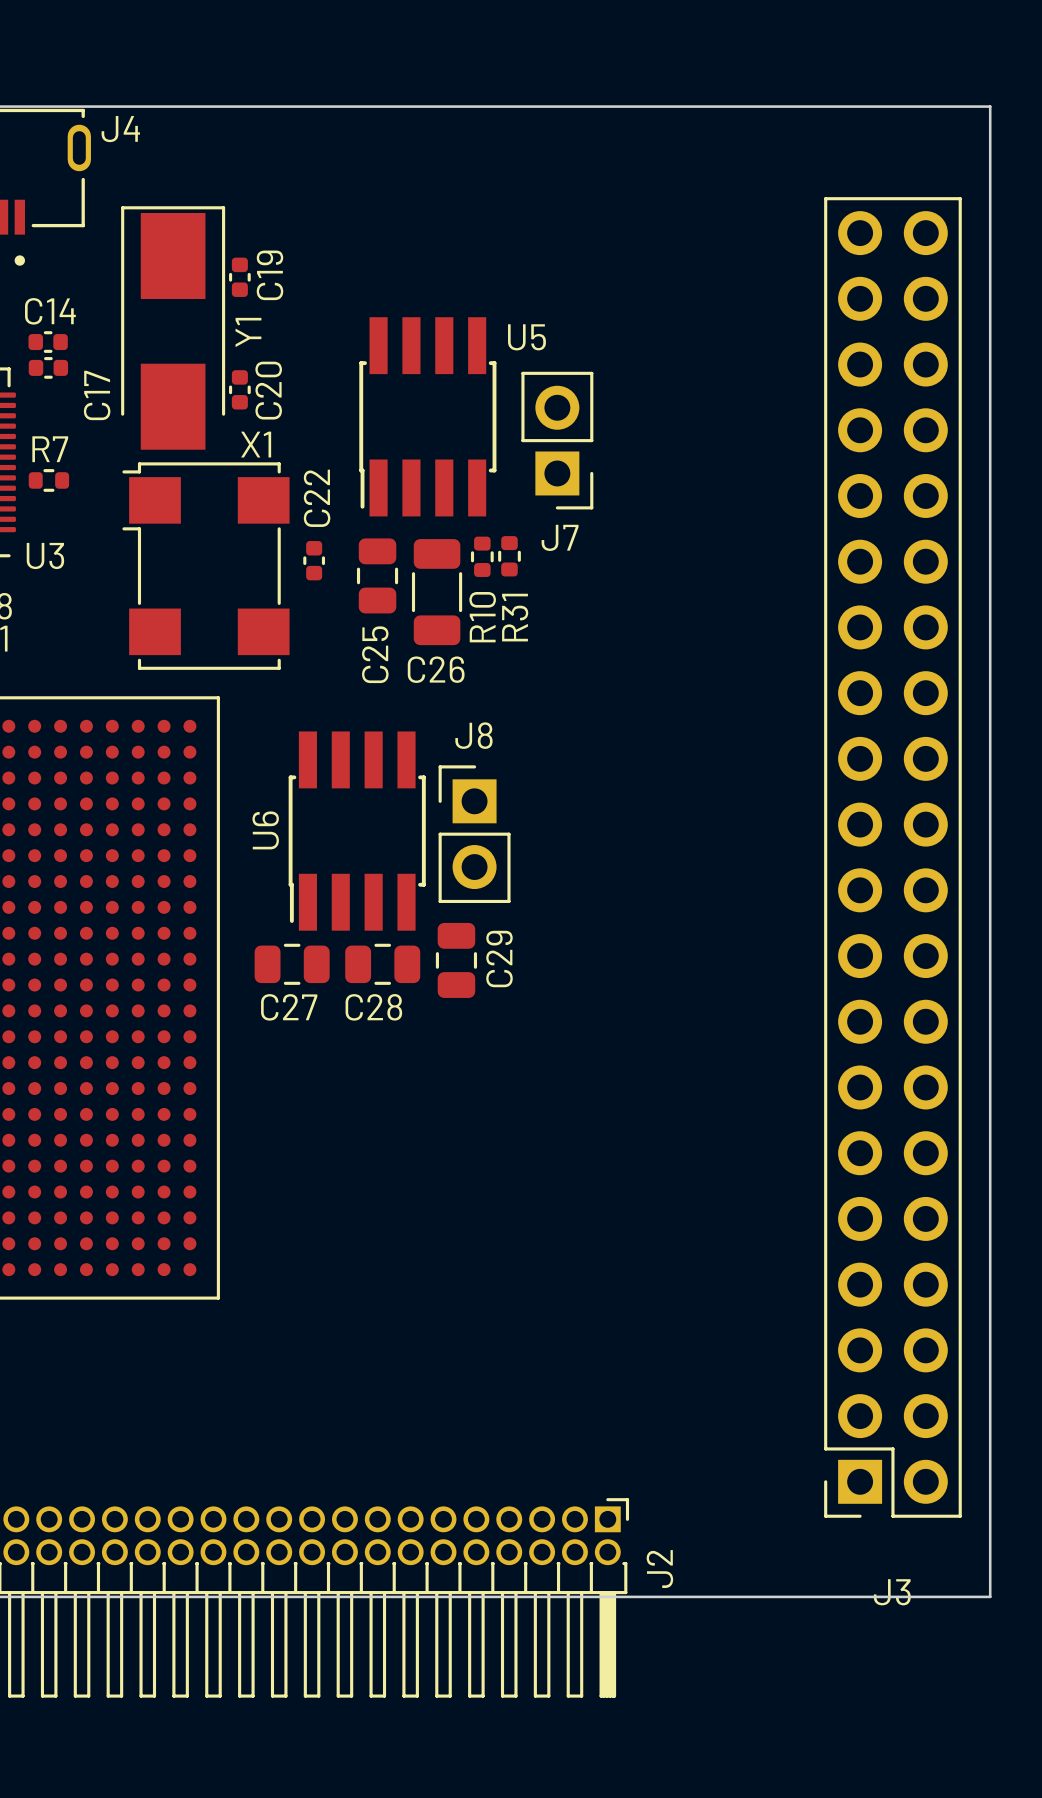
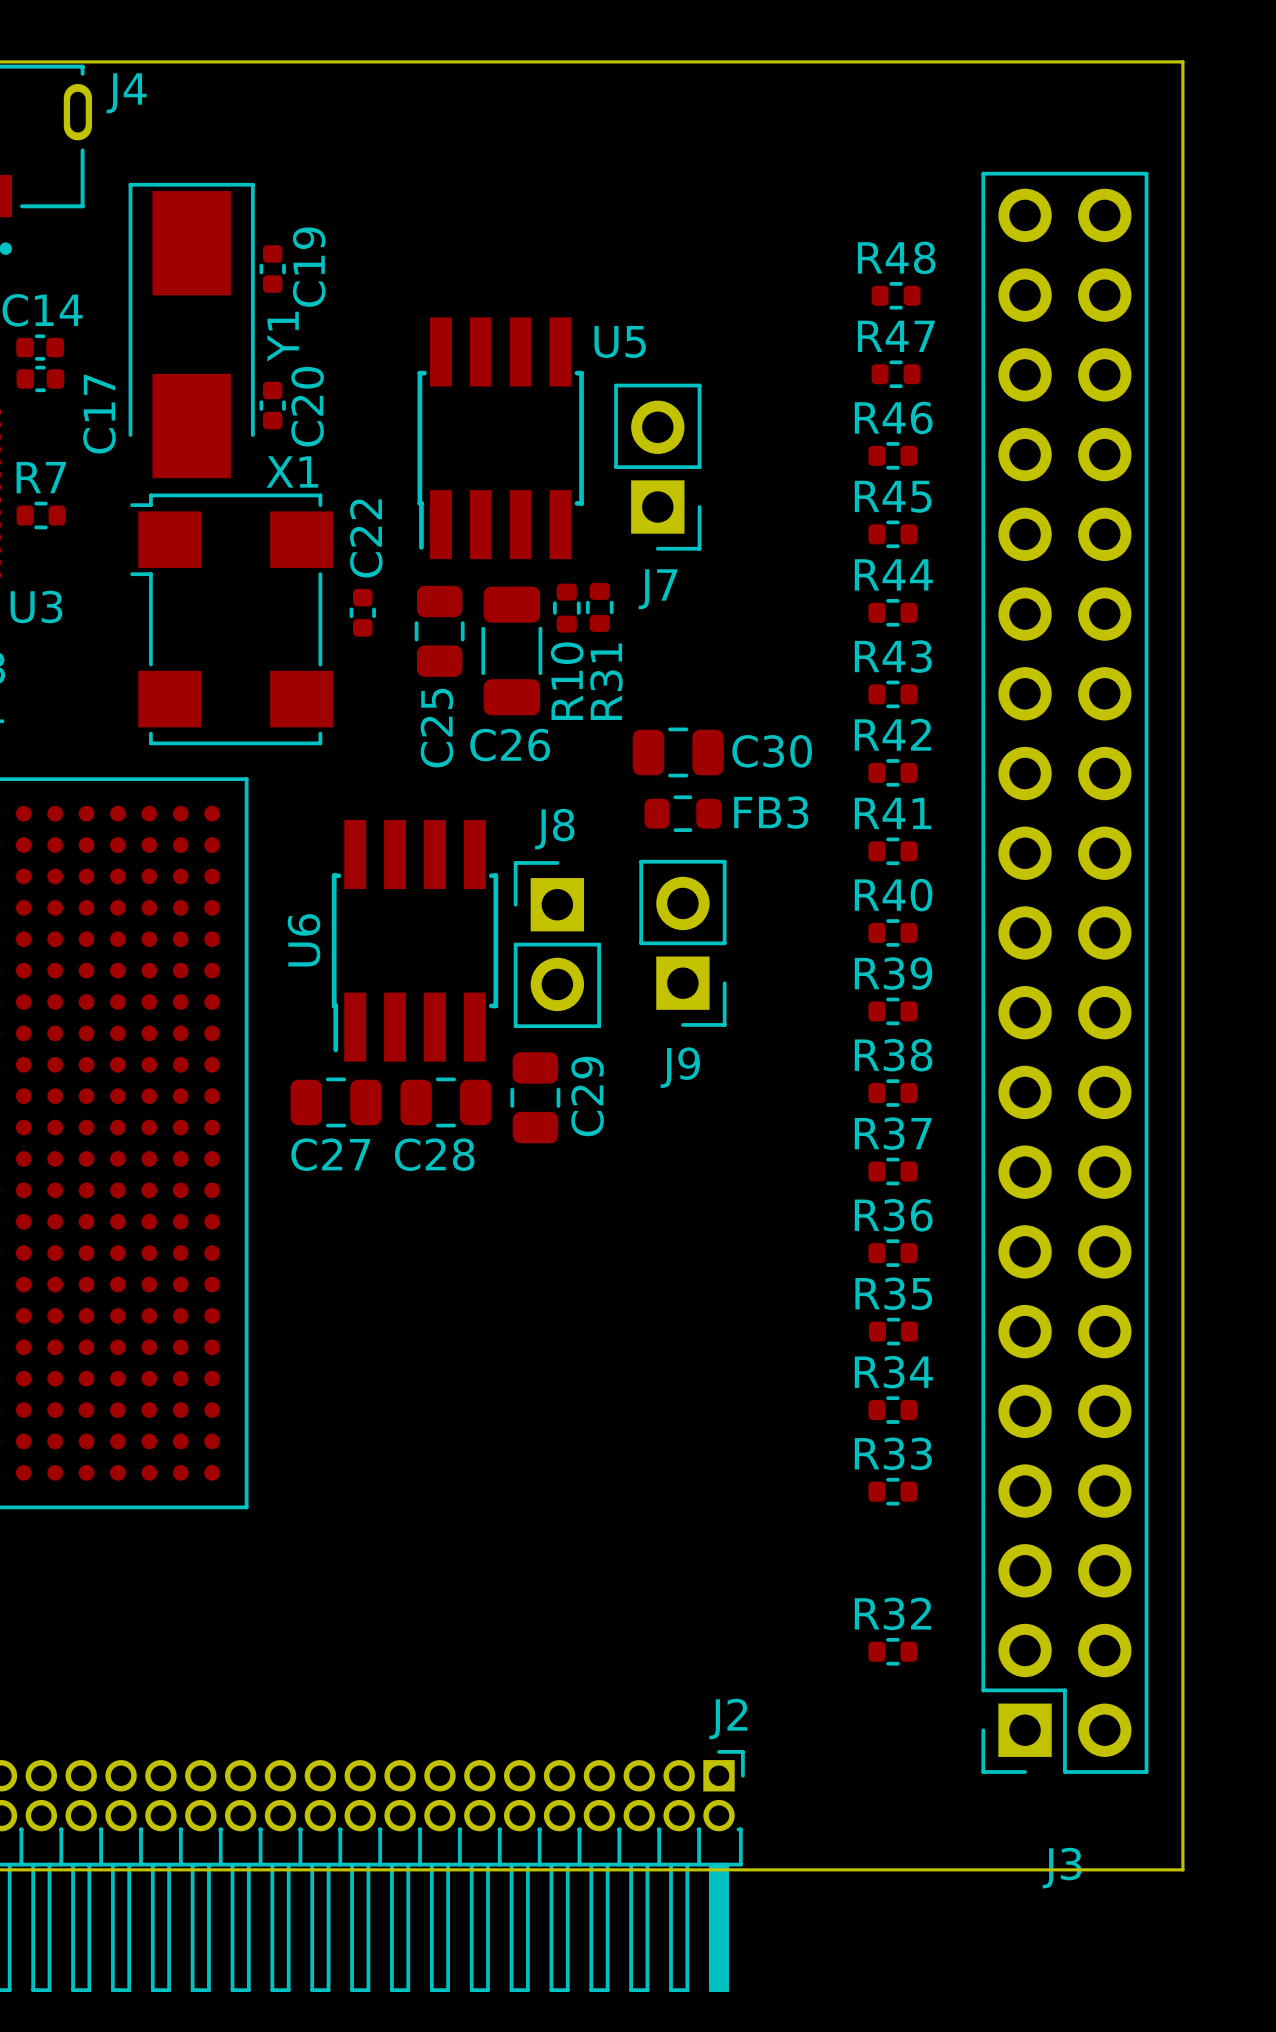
R48: none -> (896, 295)
R47: none -> (896, 374)
R46: none -> (892, 455)
R45: none -> (892, 534)
R44: none -> (892, 612)
R43: none -> (892, 694)
C30: none -> (678, 752)
R42: none -> (892, 772)
FB3: none -> (682, 813)
R41: none -> (892, 851)
R40: none -> (892, 932)
J9: none -> (682, 943)
R39: none -> (892, 1011)
R38: none -> (892, 1093)
R37: none -> (892, 1171)
R36: none -> (892, 1253)
R35: none -> (893, 1331)
R34: none -> (892, 1410)
R33: none -> (892, 1491)
R32: none -> (892, 1651)
J2 name rotation: 0° (659, 1569) -> 90° clockwise (728, 1718)
J2 name position: J2 (659, 1569) -> J2 (728, 1718)

